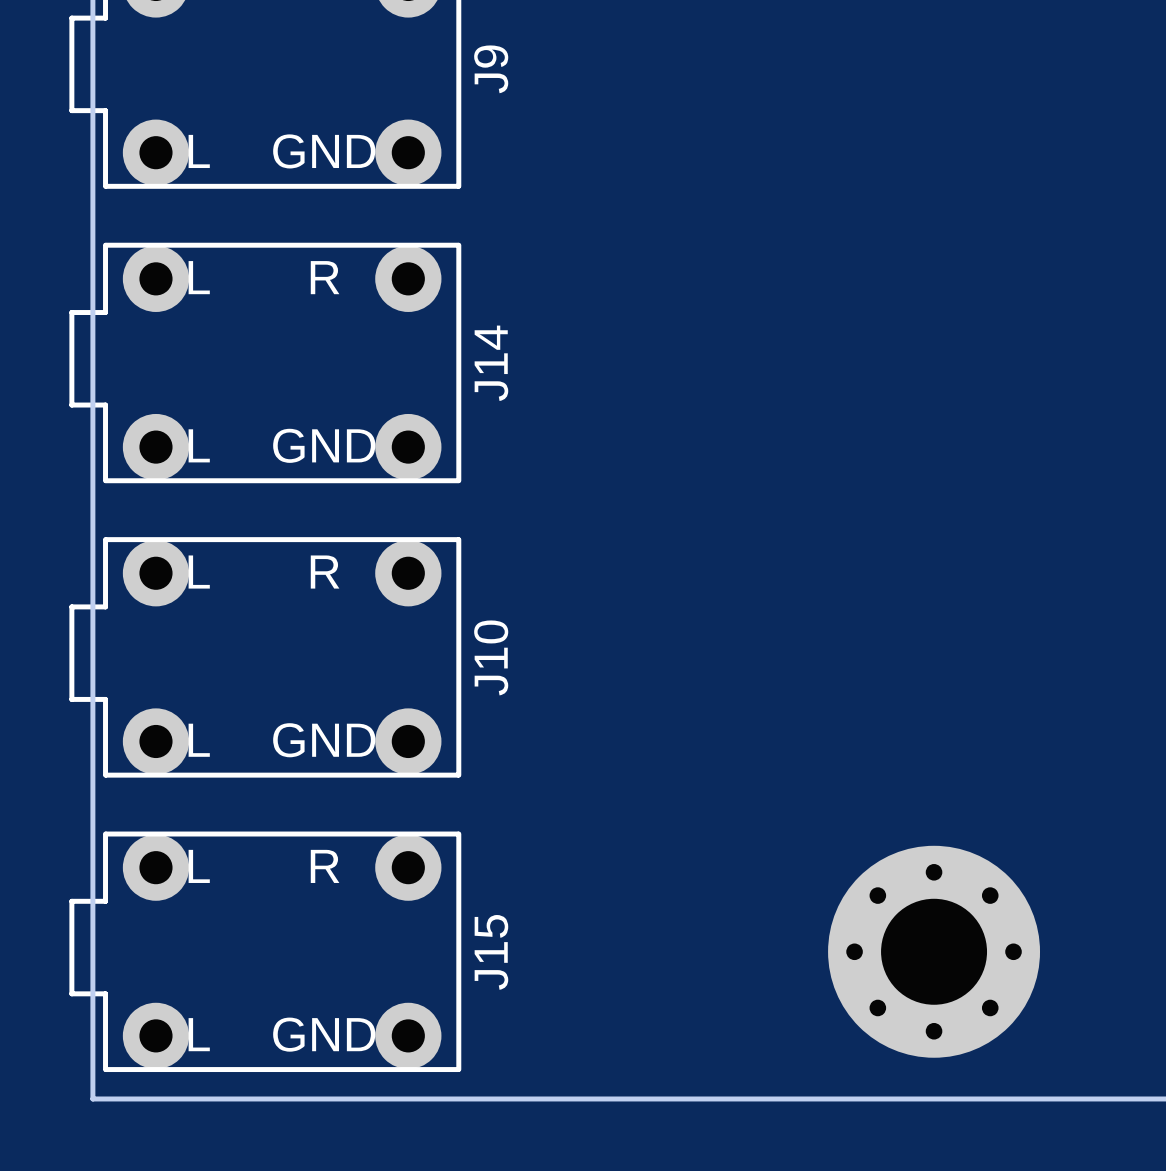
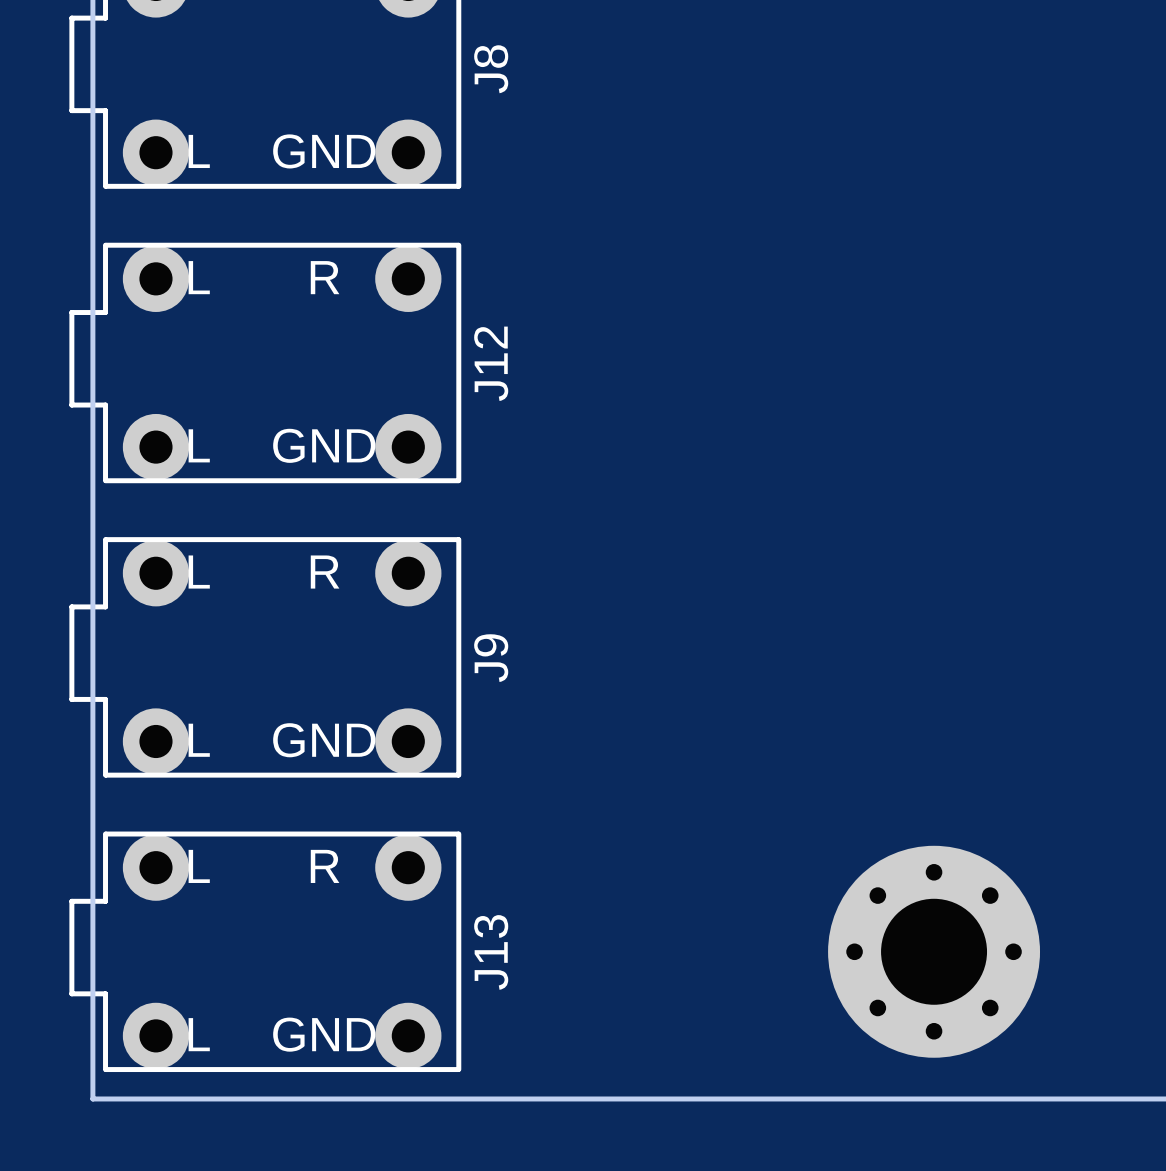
J9 name: J9 (491, 69) -> J8 (491, 69)
J14 name: J14 (491, 363) -> J12 (491, 363)
J10 name: J10 (491, 657) -> J9 (491, 658)
J15 name: J15 (491, 952) -> J13 (491, 952)

